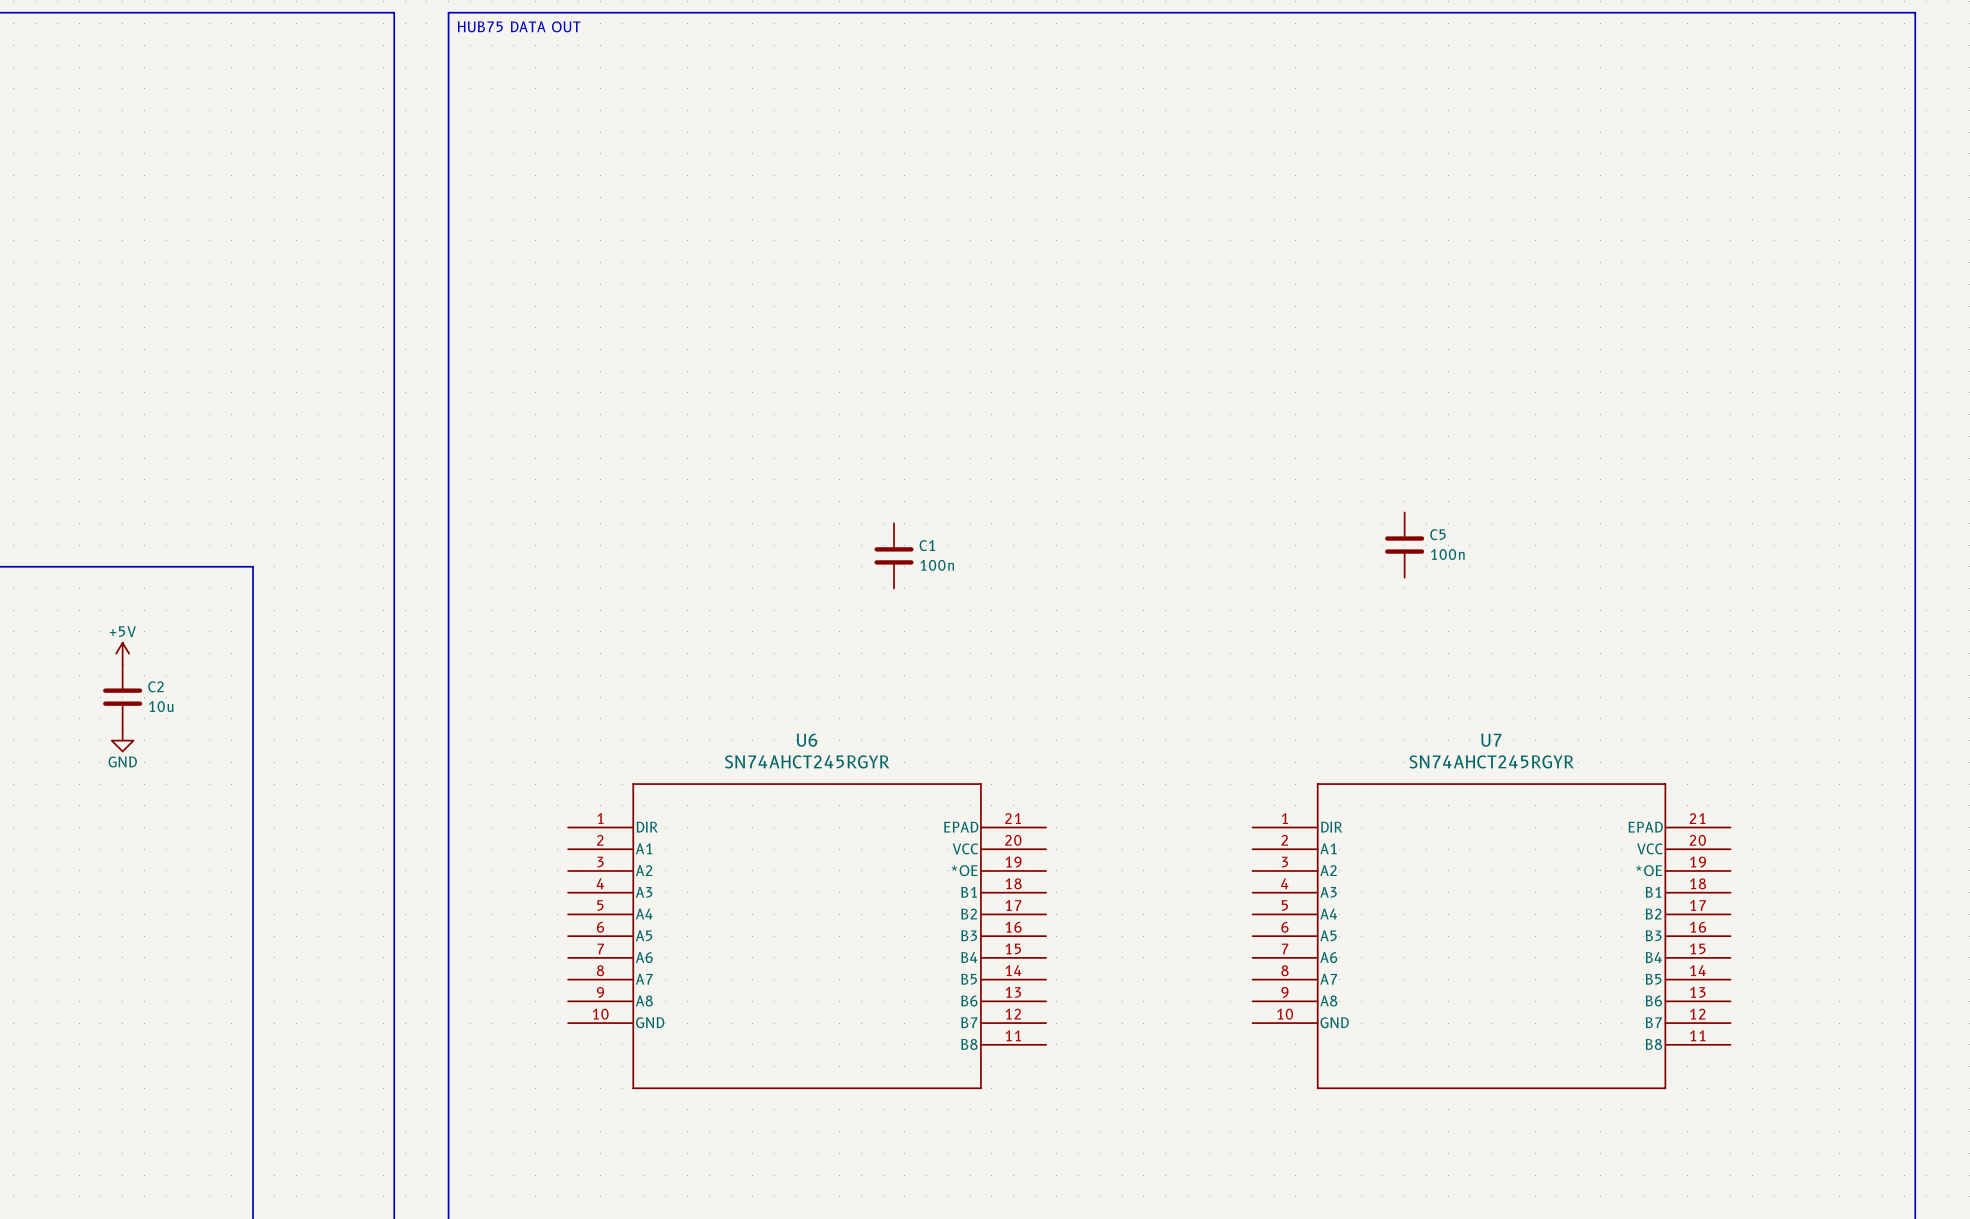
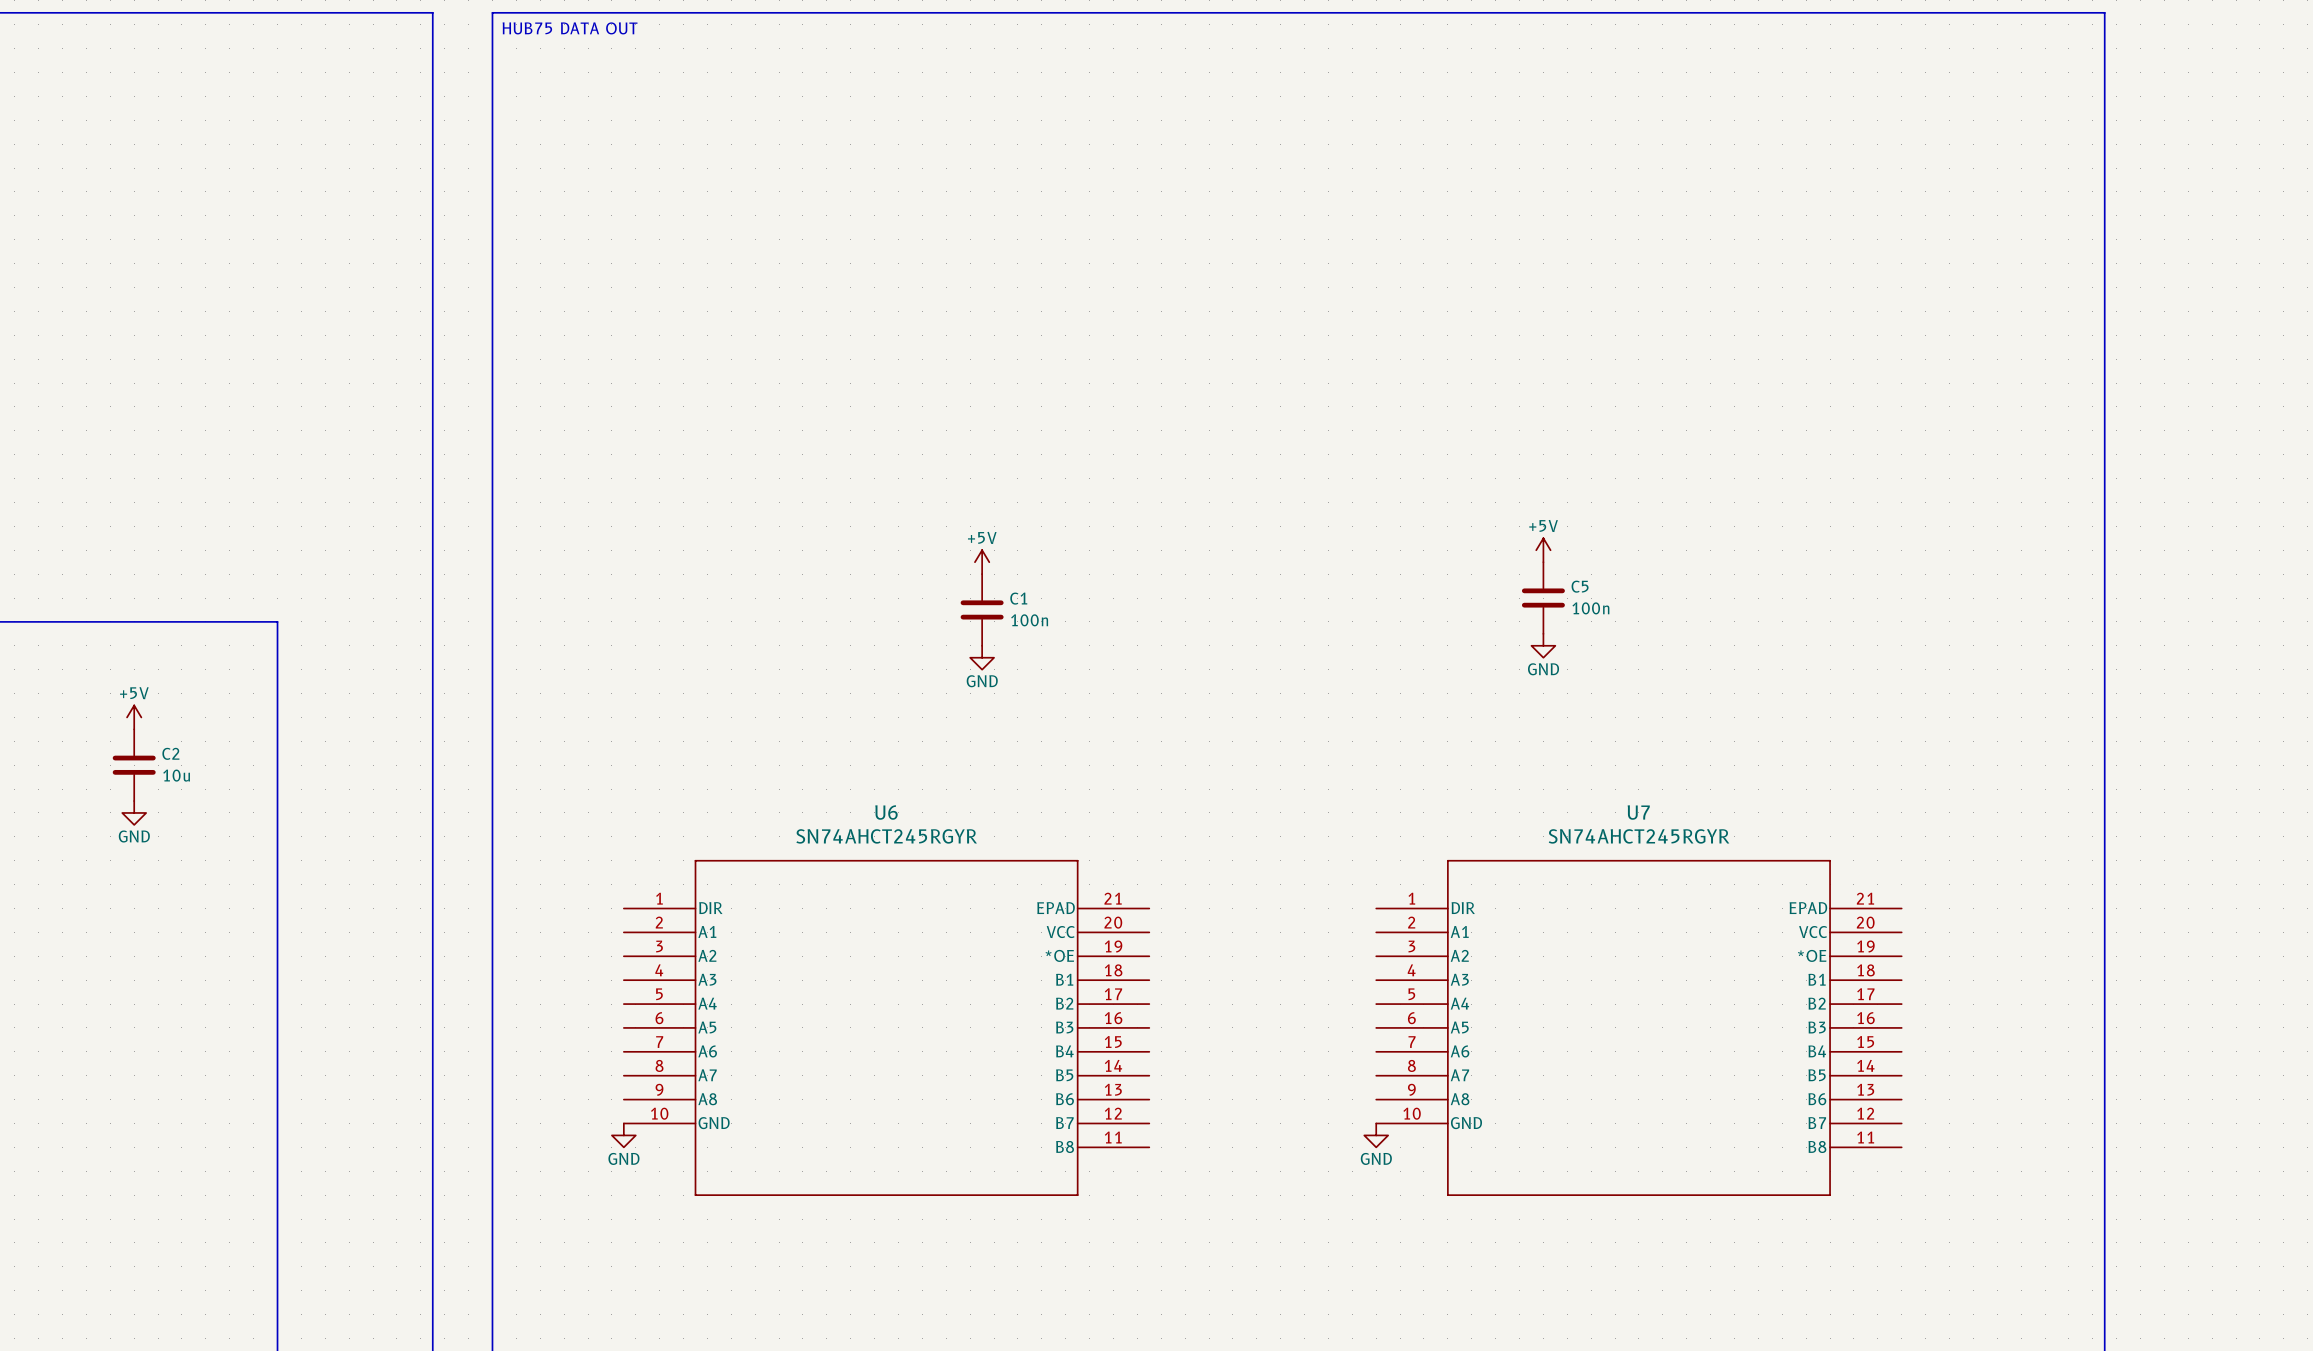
power symbol: none -> +5V (1543, 550)
power symbol: none -> +5V (982, 562)
power symbol: none -> GND (1543, 645)
power symbol: none -> GND (982, 657)
power symbol: none -> GND (623, 1135)
power symbol: none -> GND (1376, 1135)

